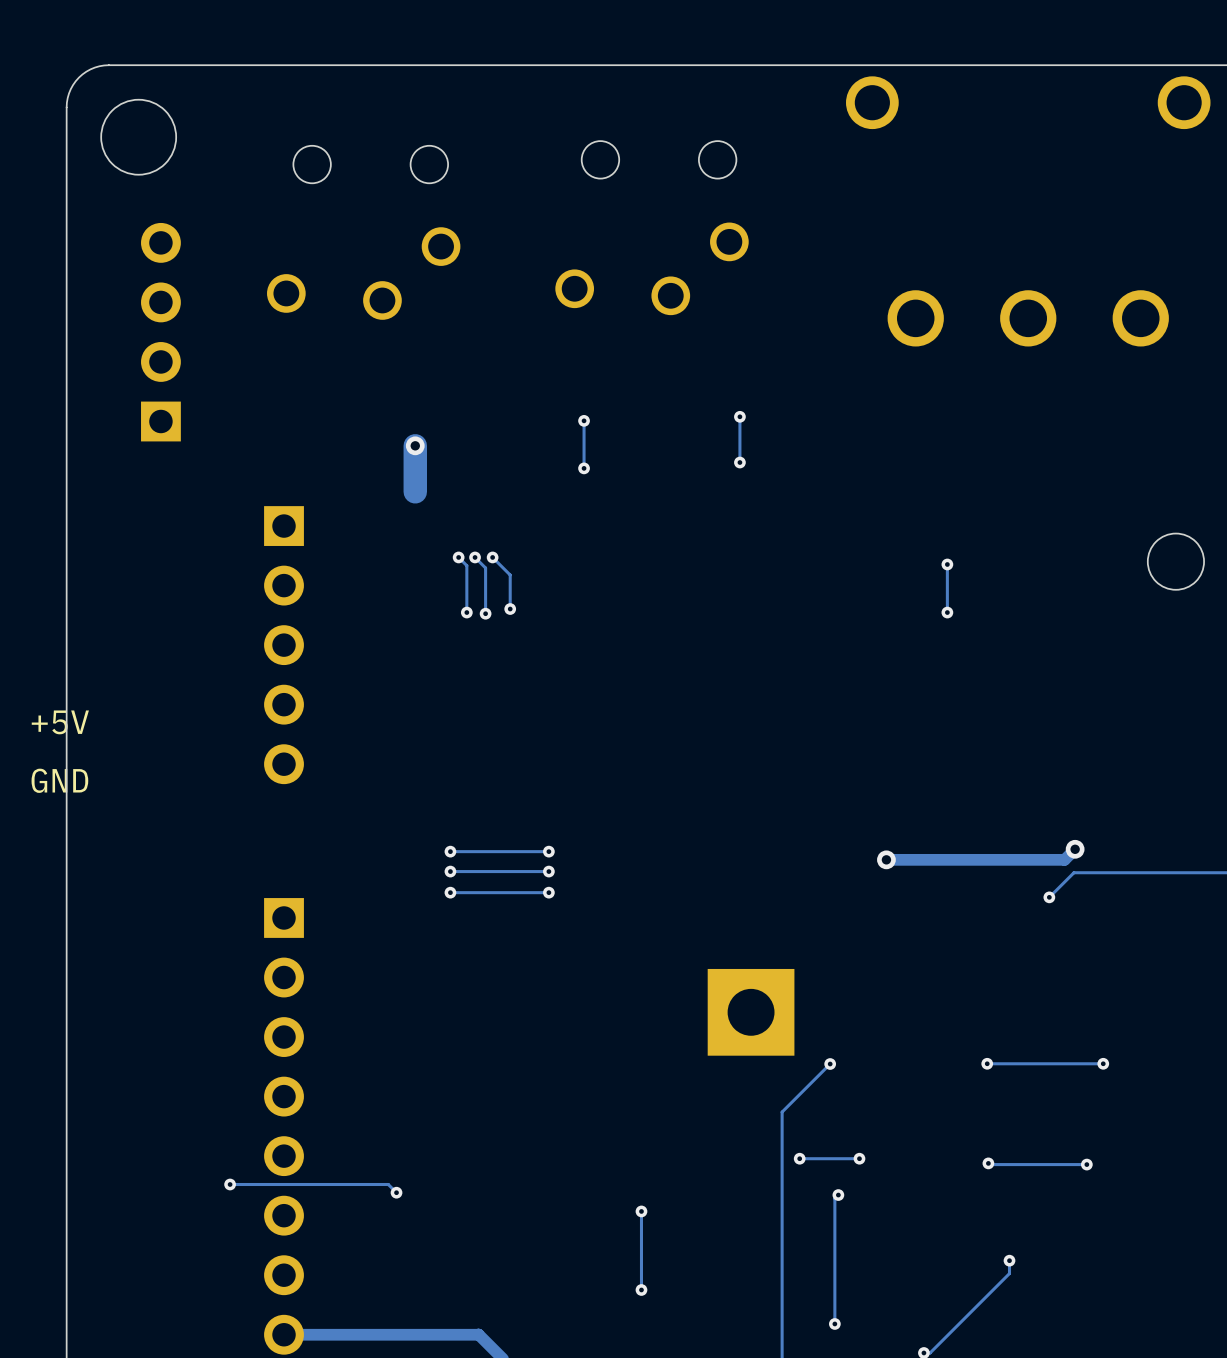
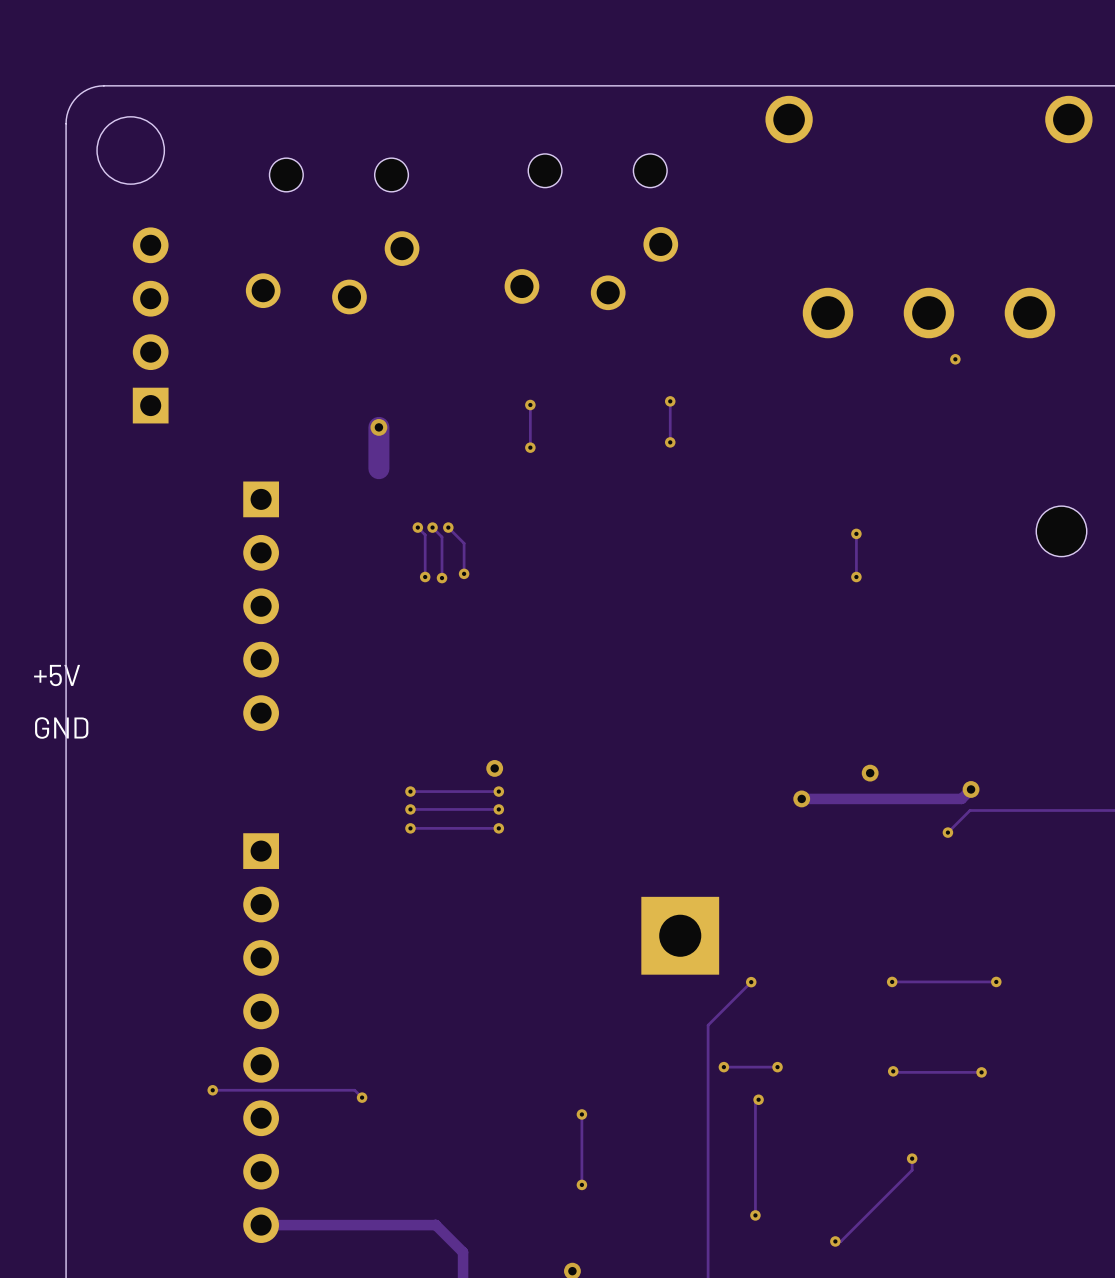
via: none -> (955, 359)
via: none -> (494, 768)
via: none -> (870, 773)

